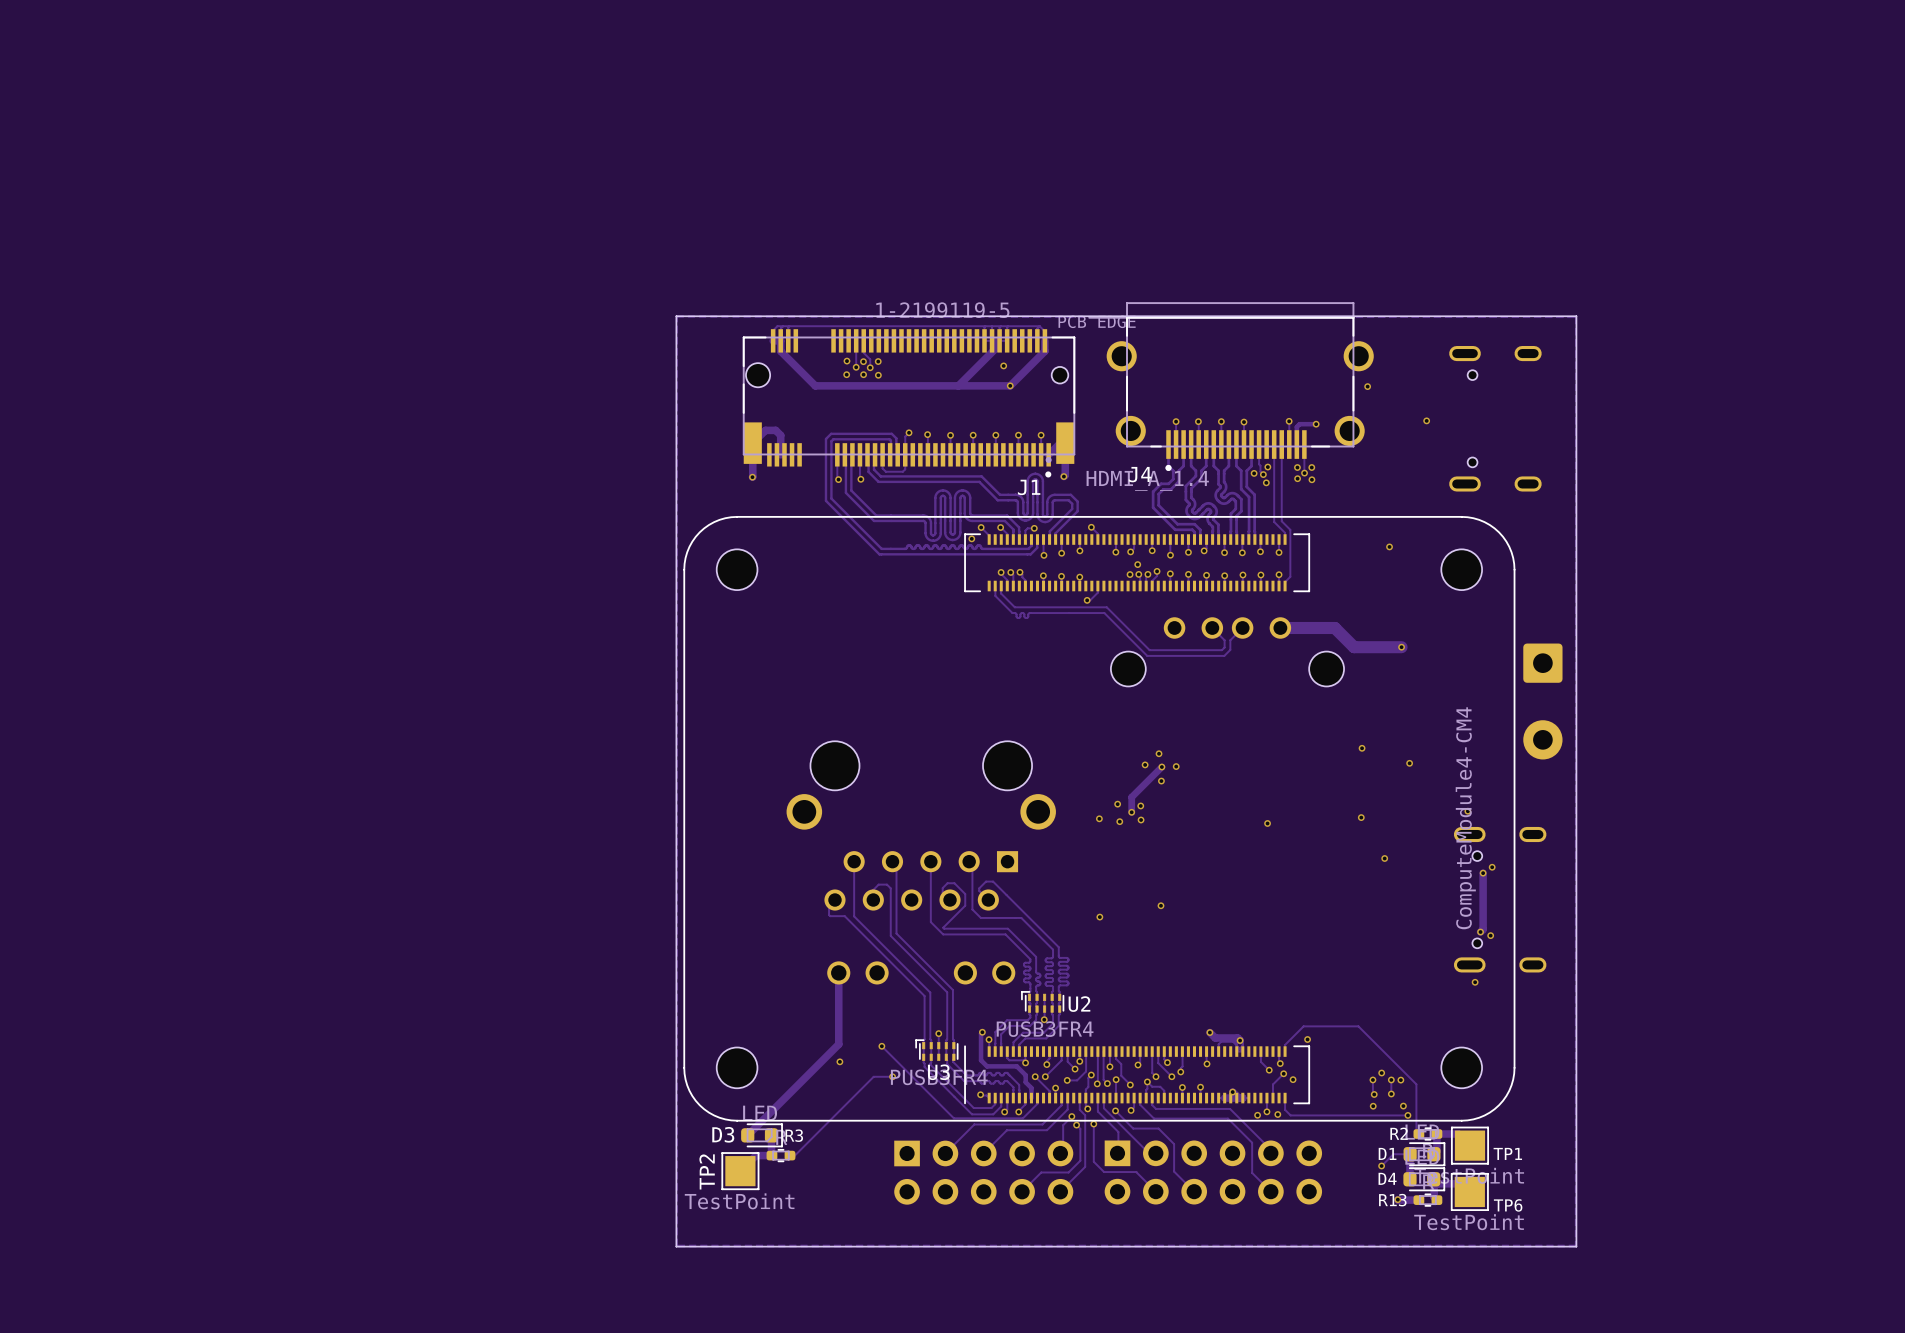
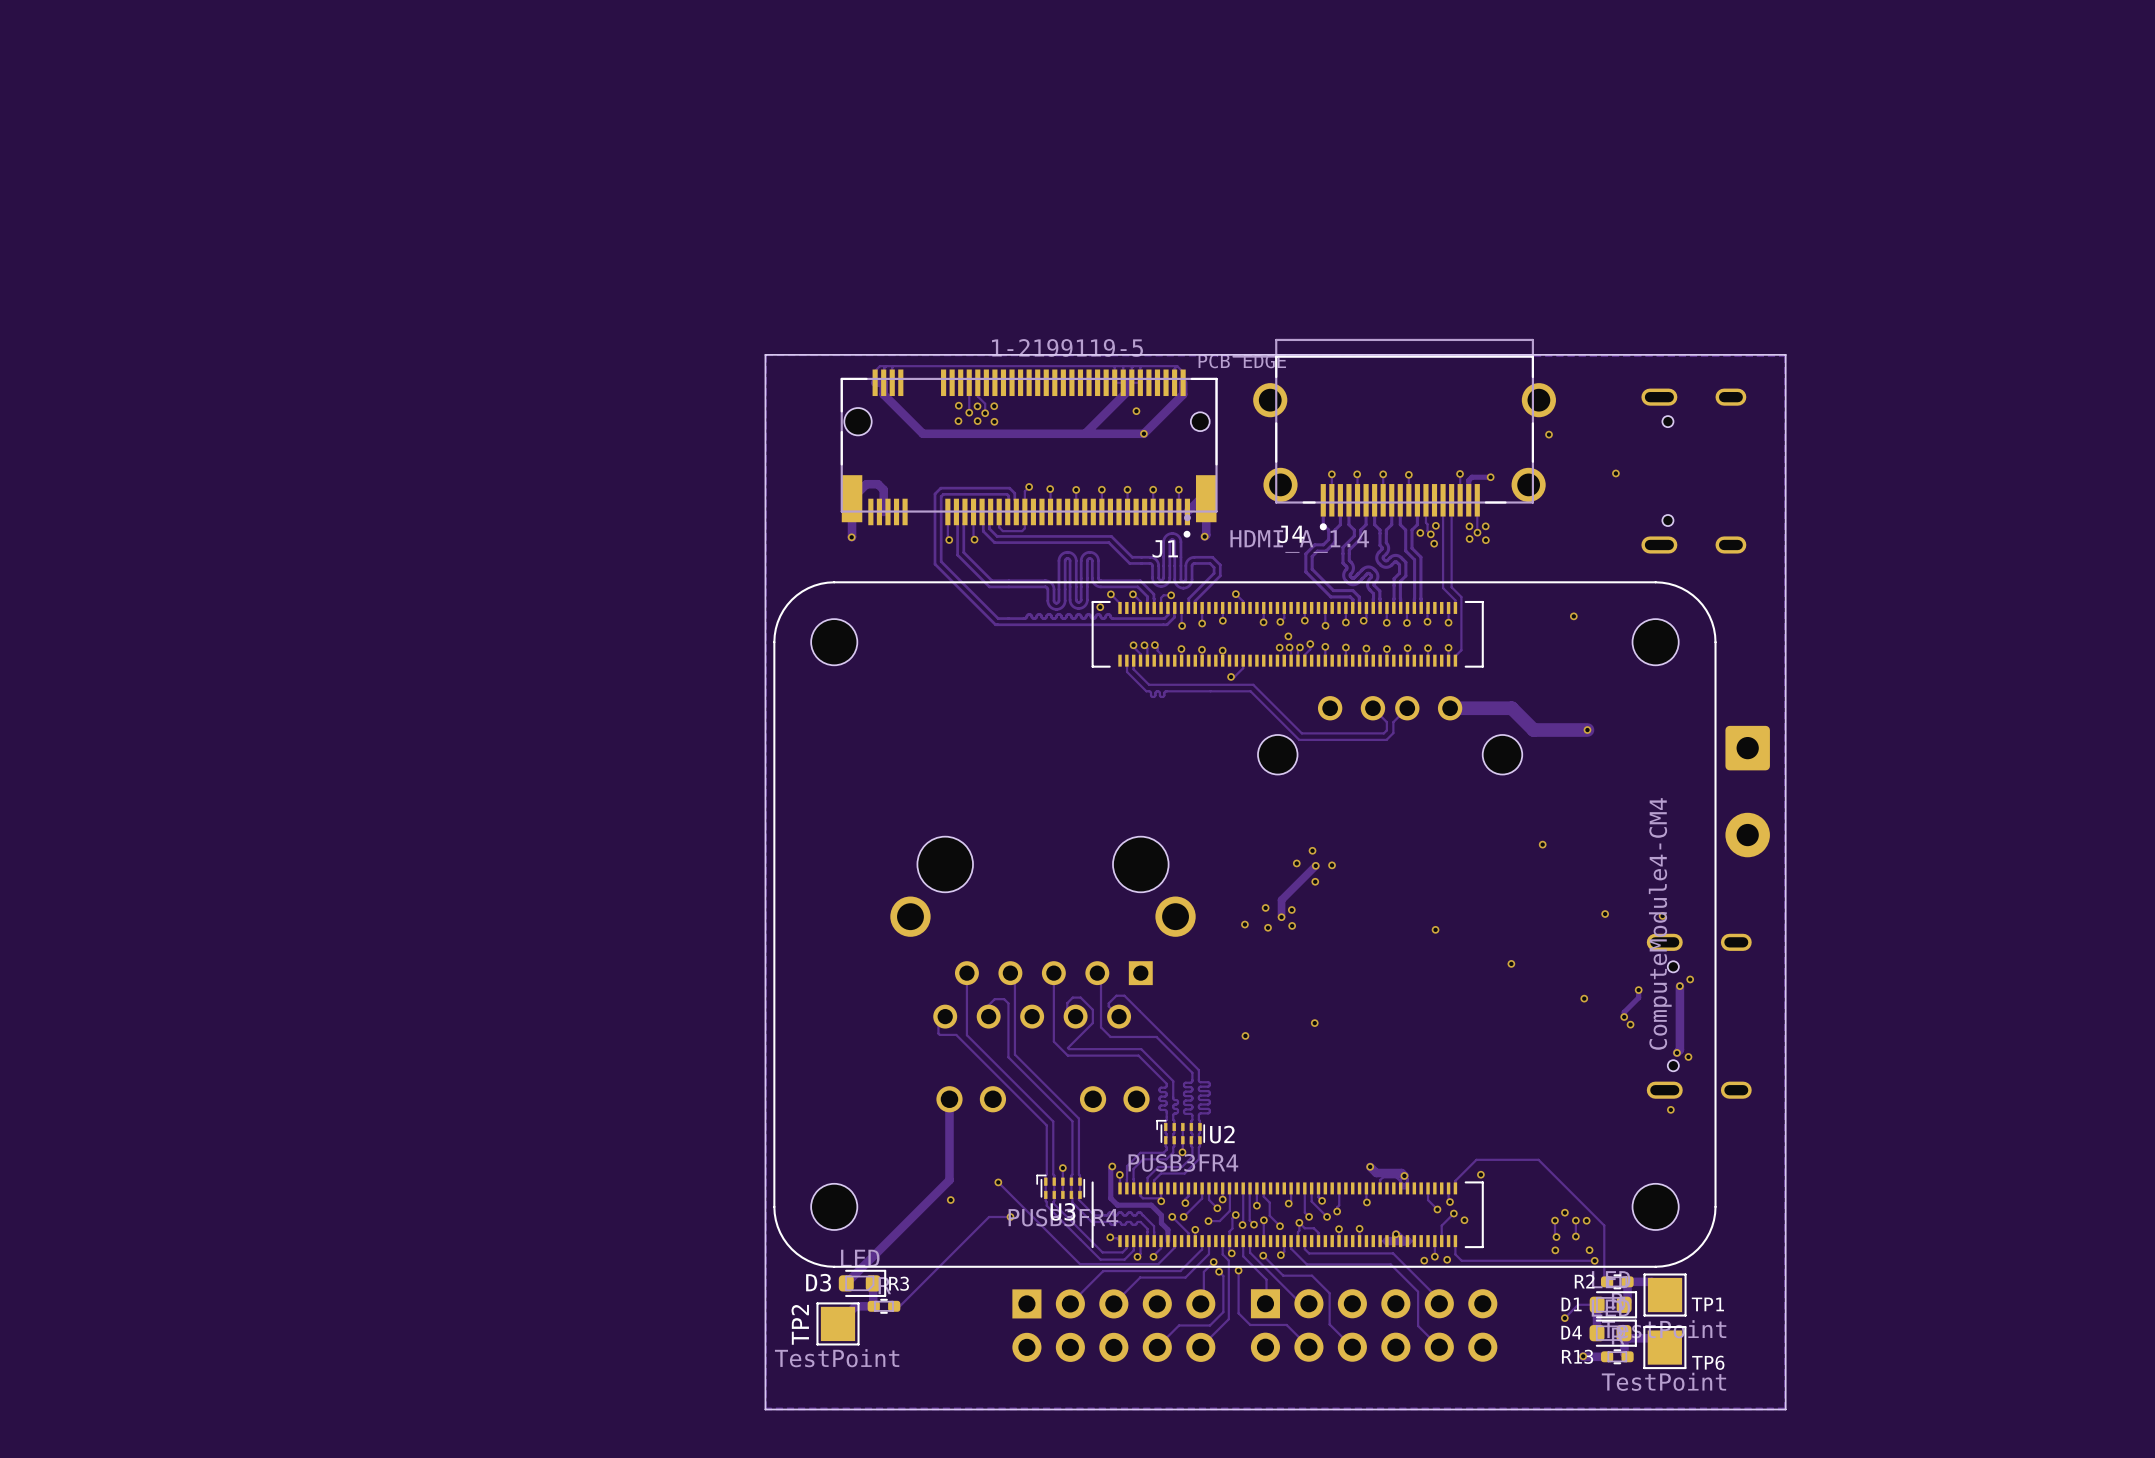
via: (1409, 763) -> none
via: none -> (1605, 914)
via: (1361, 817) -> none
via: none -> (1511, 963)
via: (1384, 858) -> none
track: none -> (1638, 990) (1638, 997) (1624, 1012) (1624, 1017)
via: none -> (1638, 990)
via: none -> (1584, 998)
via: none -> (1624, 1017)
via: none -> (1630, 1024)

